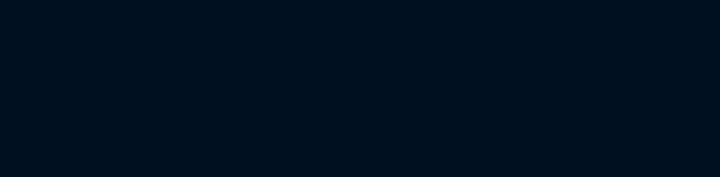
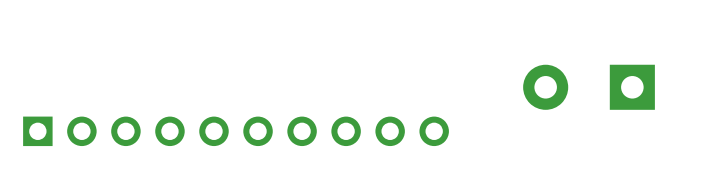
part: none -> (589, 87)
part: none -> (236, 131)

